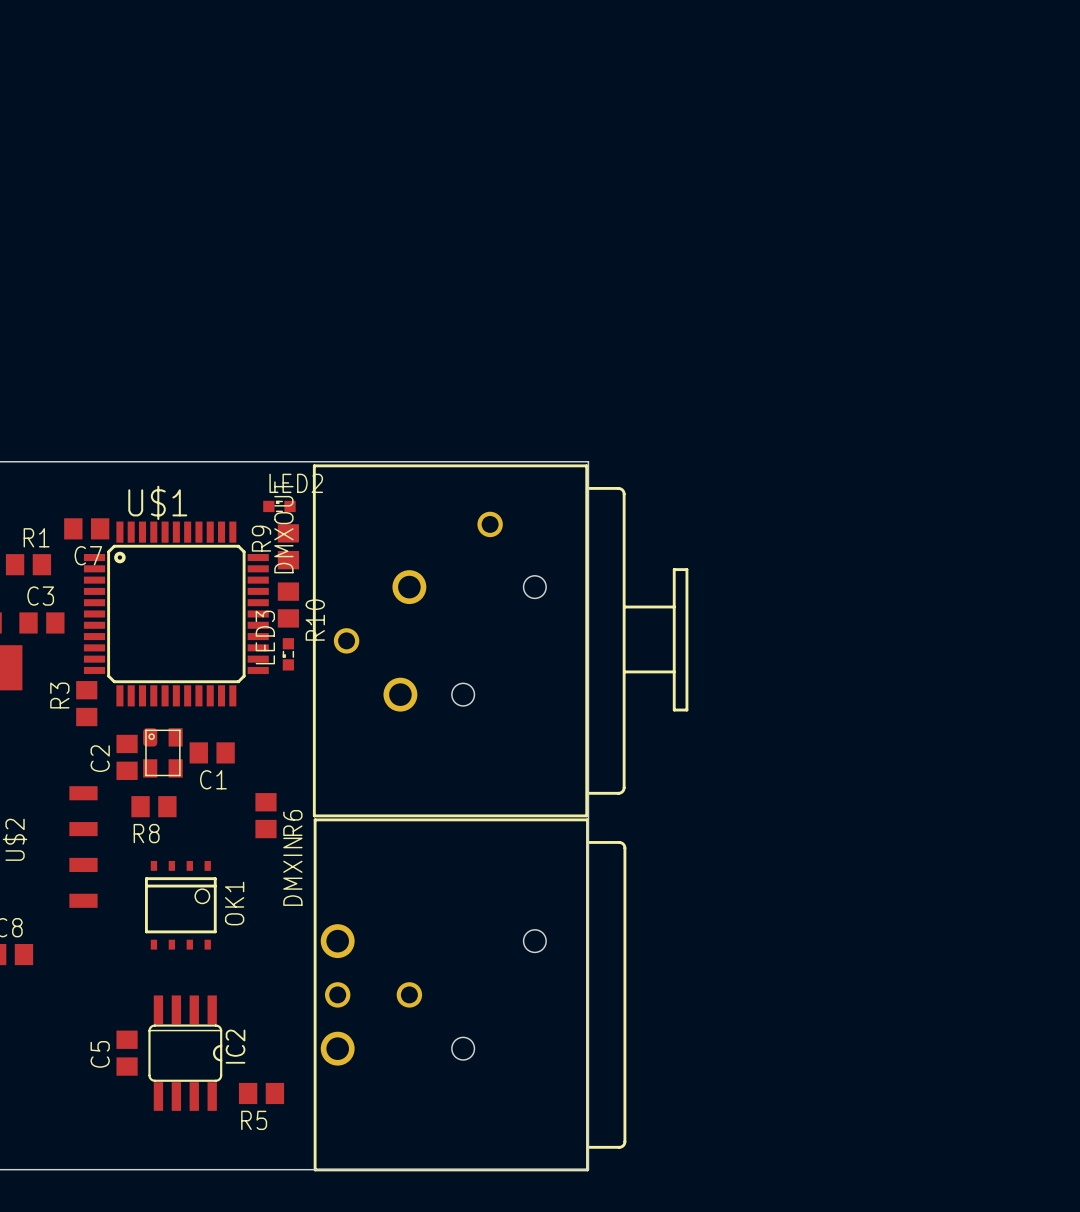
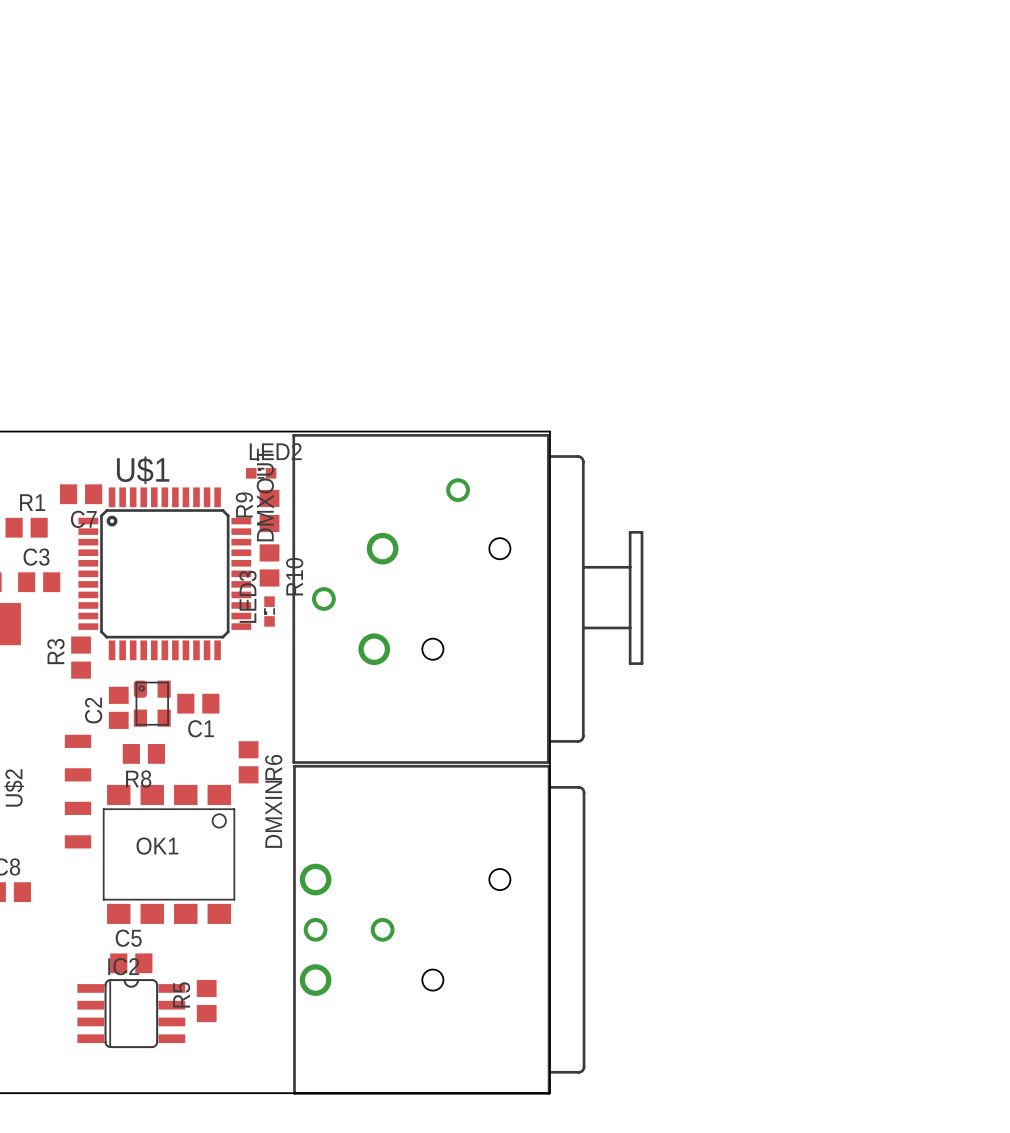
OK1 footprint: [144, 860, 217, 950] -> [102, 784, 236, 924]
OK1 name position: OK1 (234, 903) -> OK1 (157, 846)
C5 rotation: 0° (127, 1053) -> 90° clockwise (131, 963)
IC2 rotation: 0° (185, 1053) -> 90° counterclockwise (131, 1013)
R5 rotation: 0° (261, 1093) -> 90° clockwise (206, 1001)
R5 position: (261, 1093) -> (206, 1001)

